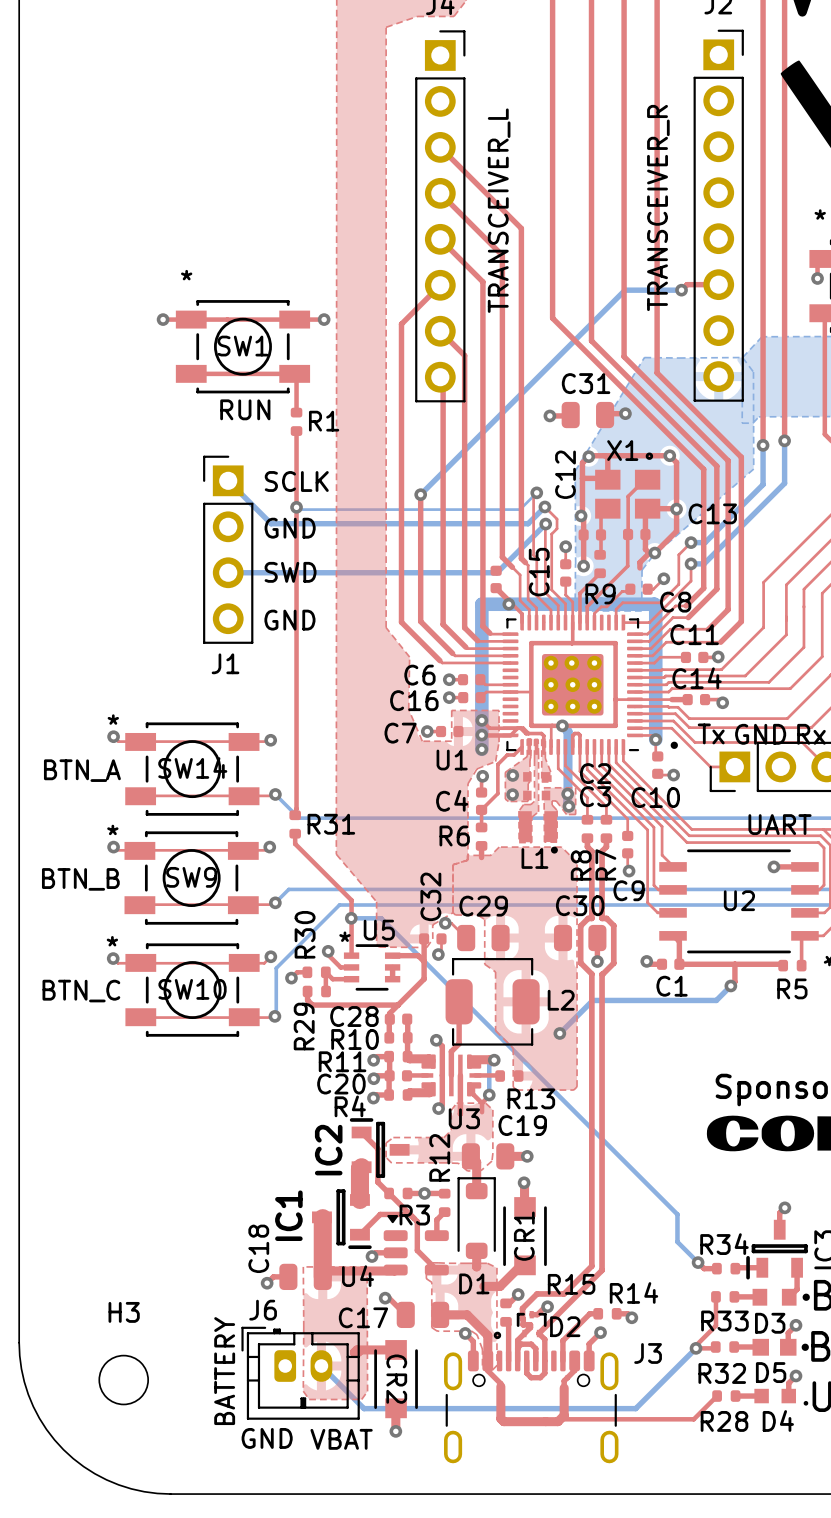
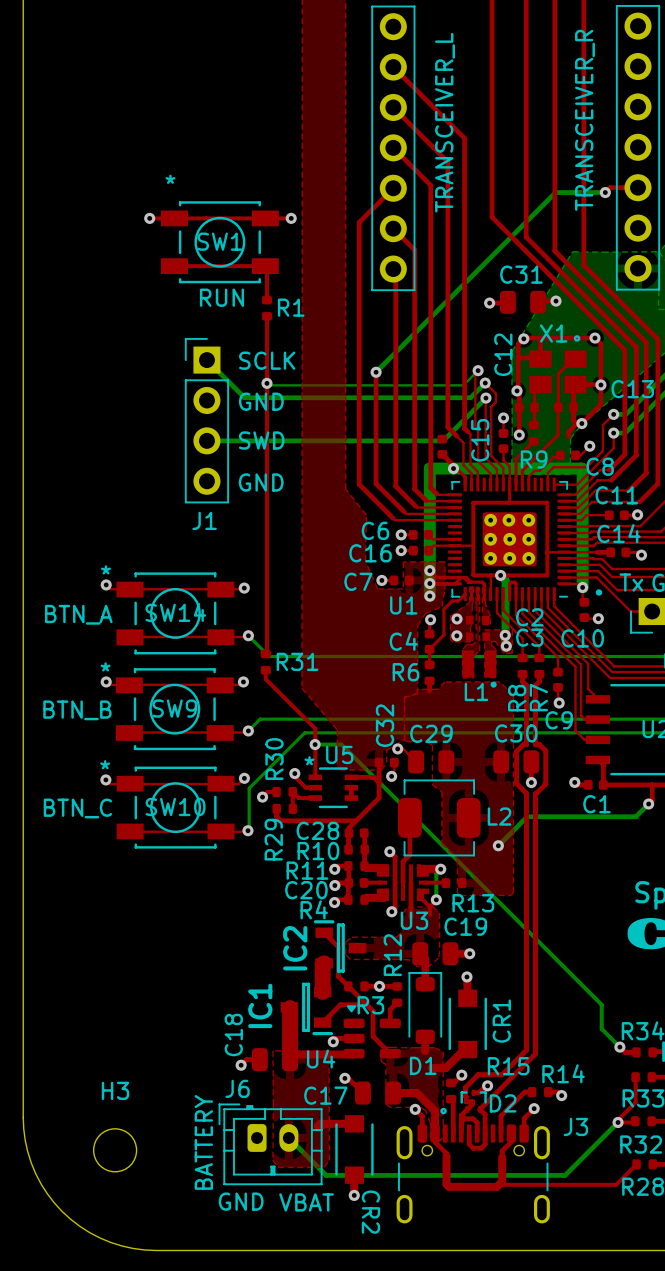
CR1 name position: CR1 (524, 1236) -> CR1 (501, 1021)
CR2 name position: CR2 (396, 1379) -> CR2 (370, 1212)

